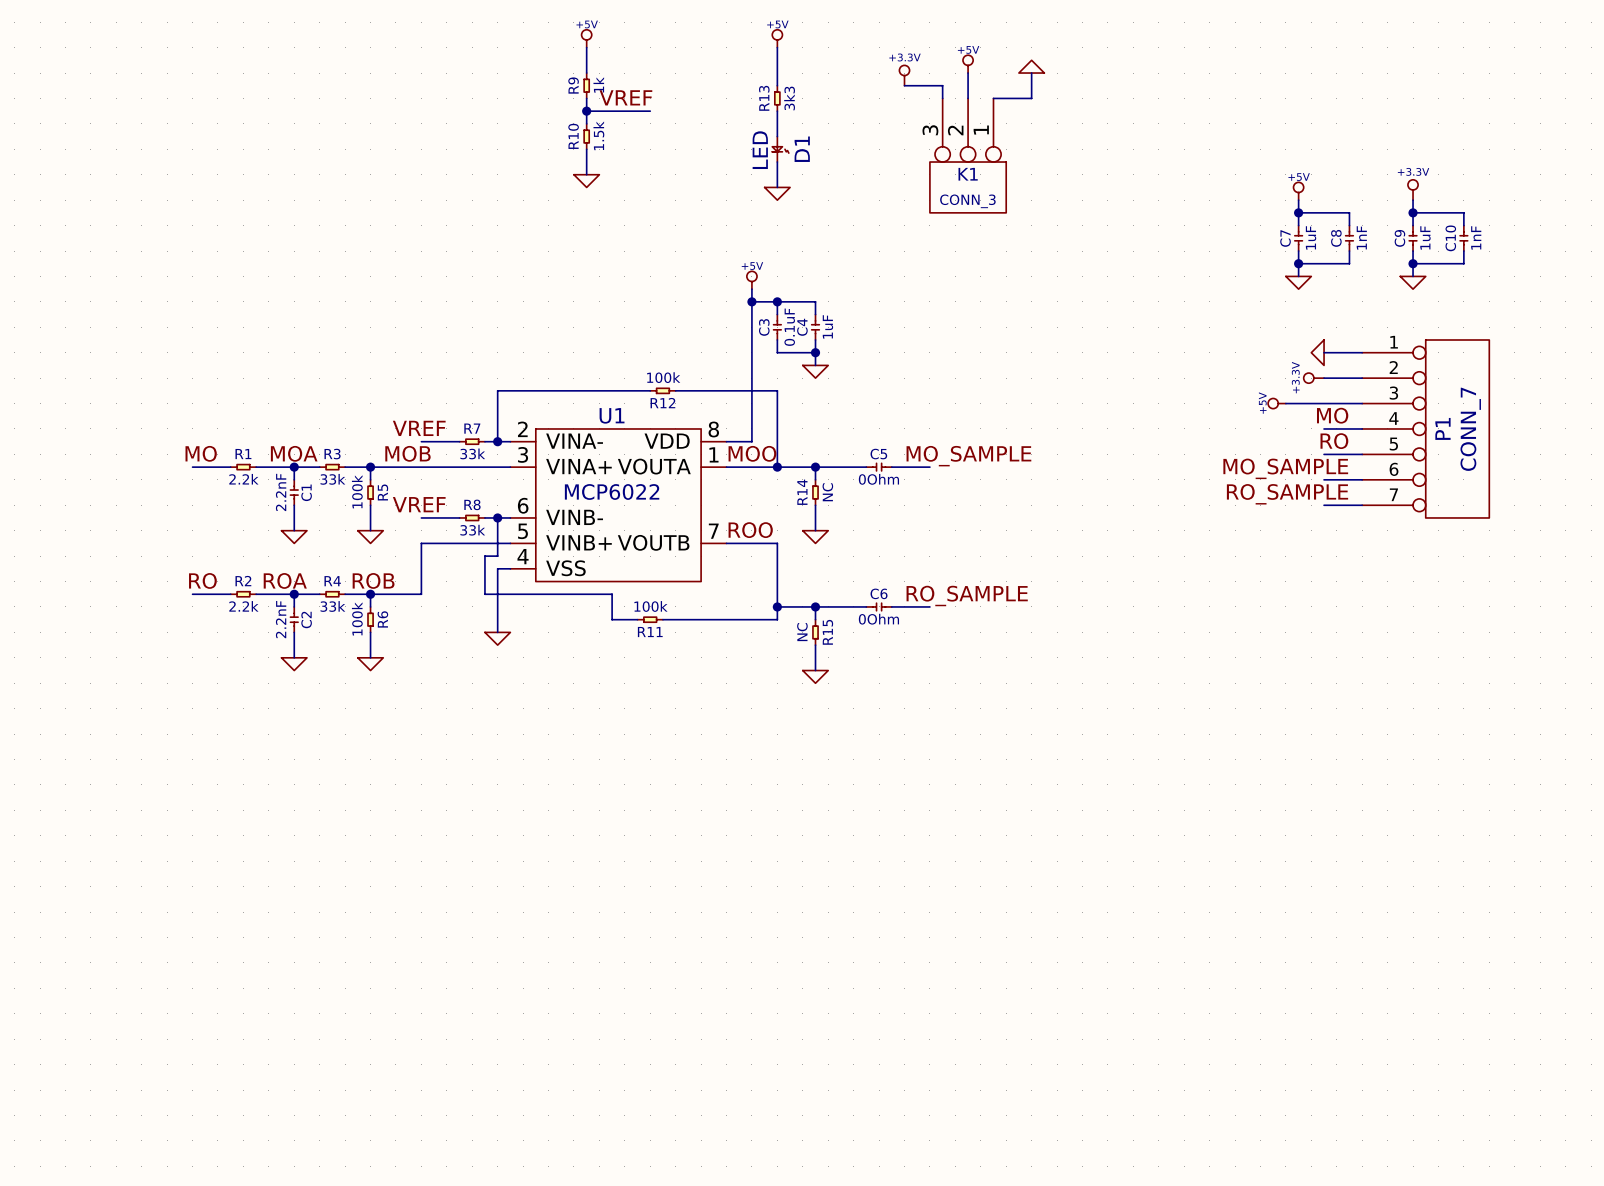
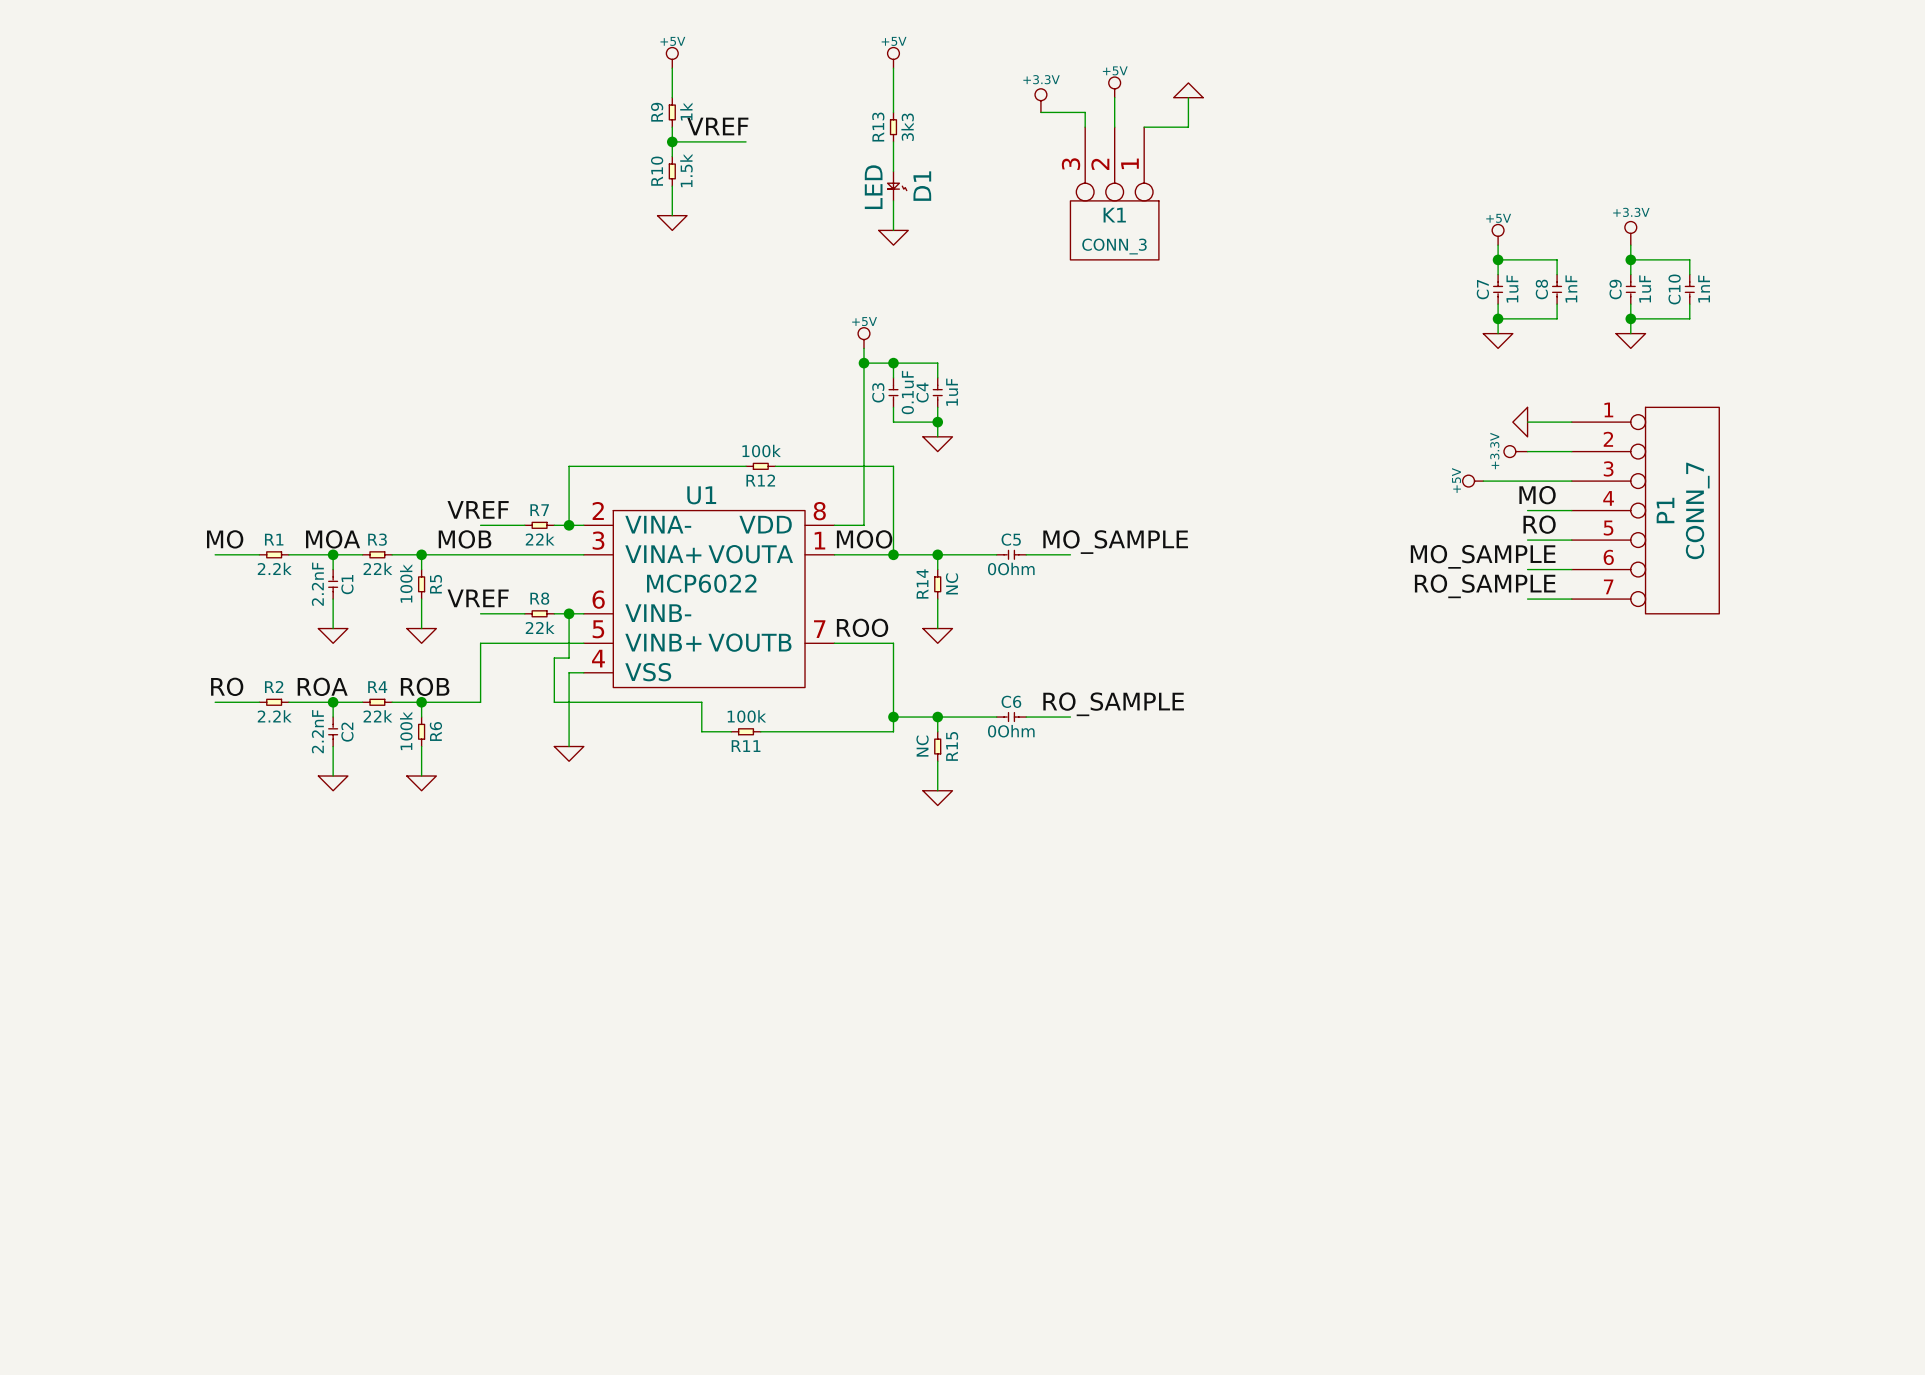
R7 value: 33k (472, 453) -> 22k (540, 539)
R3 value: 33k (332, 479) -> 22k (377, 568)
R8 value: 33k (472, 530) -> 22k (540, 627)
R4 value: 33k (332, 606) -> 22k (377, 716)

